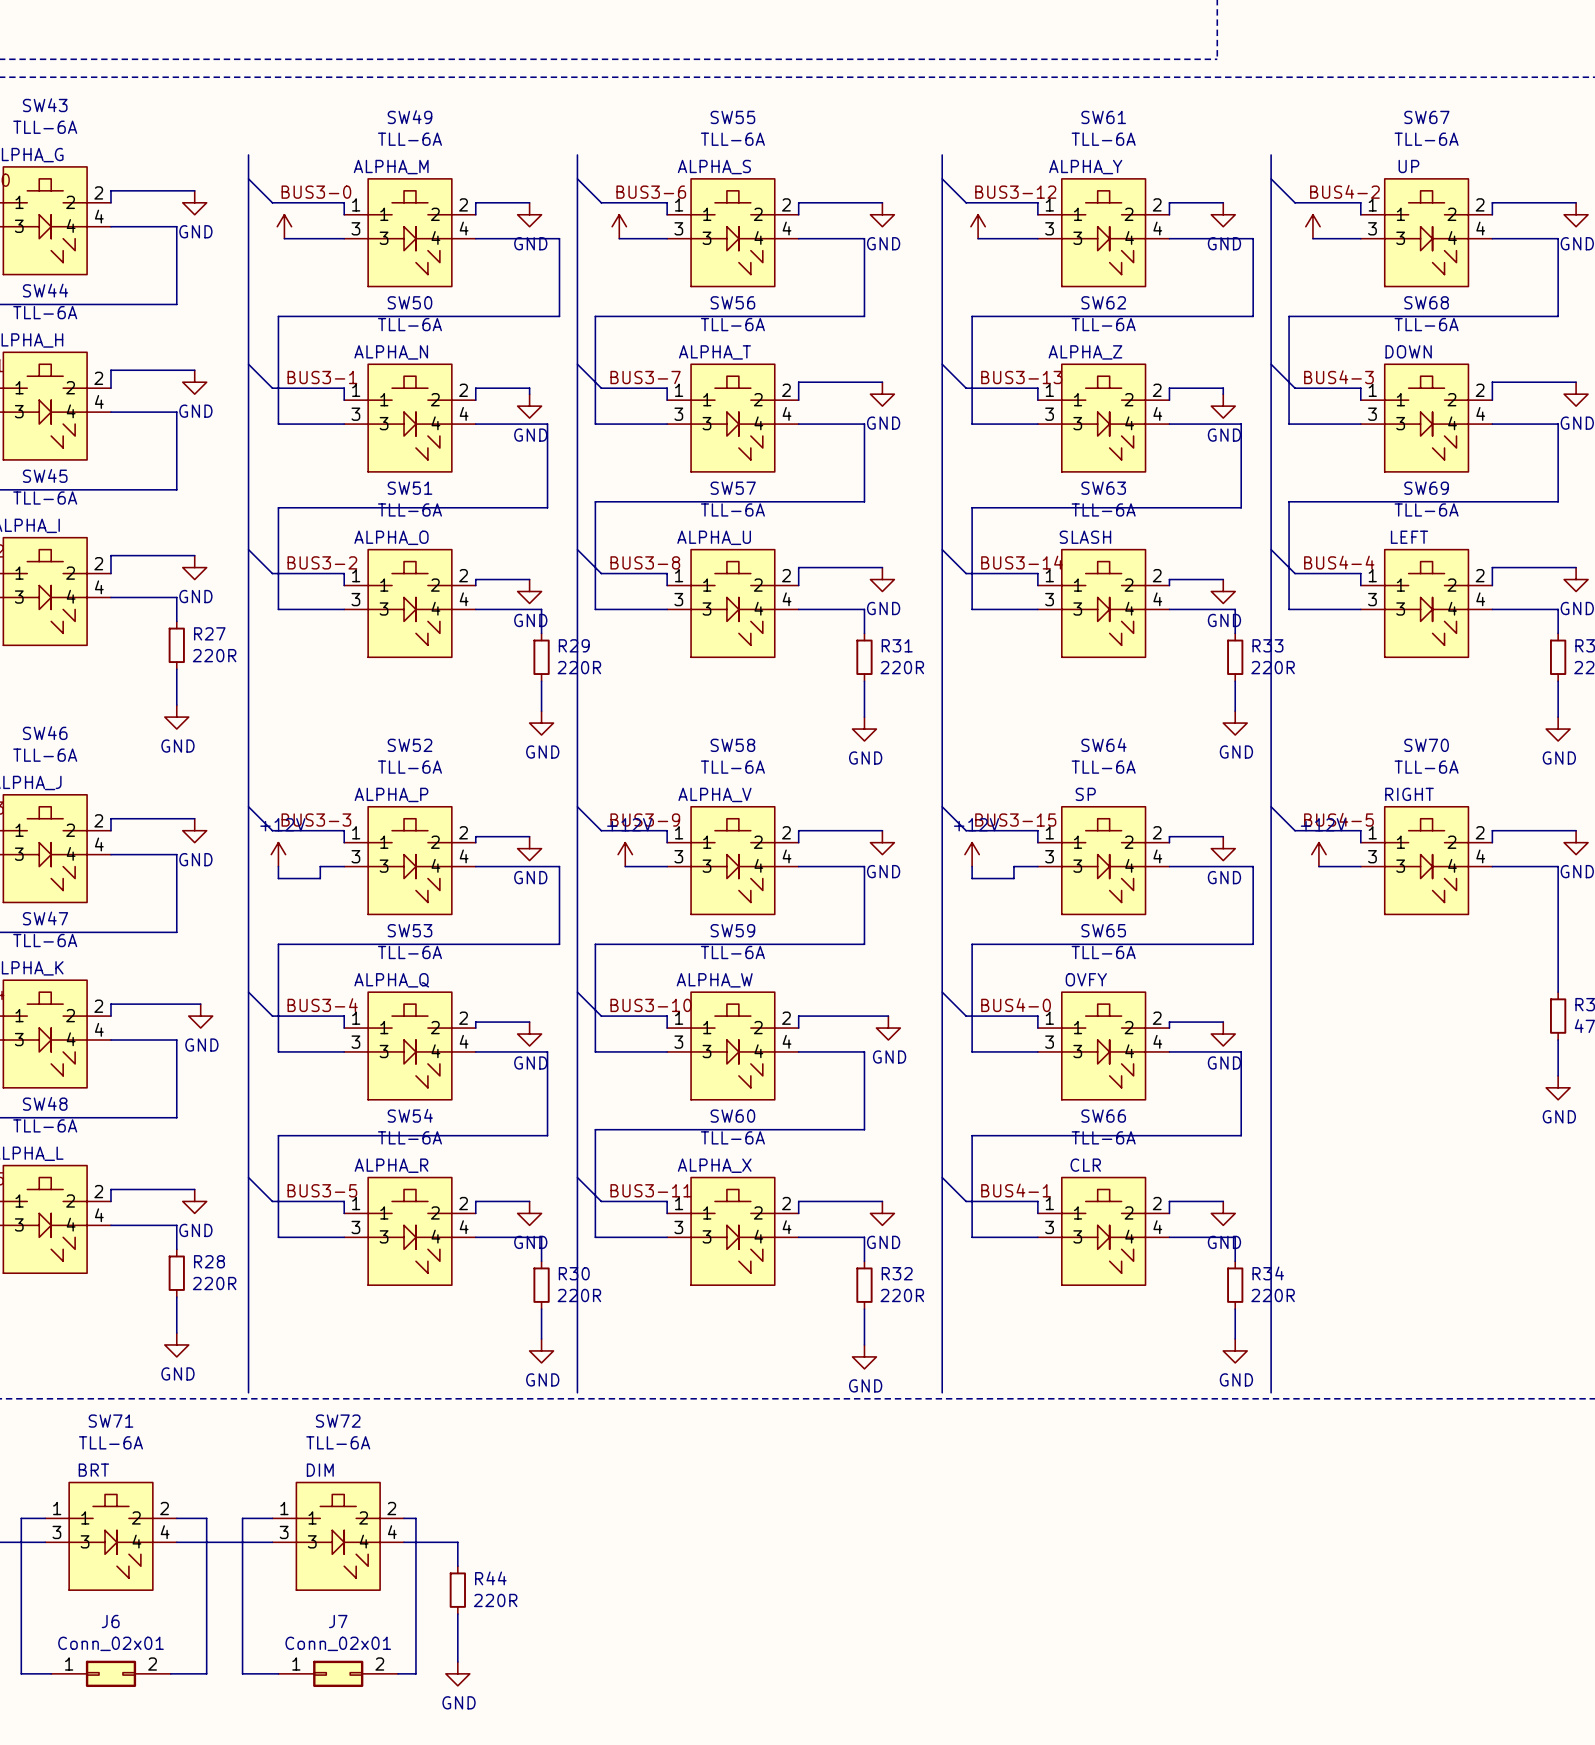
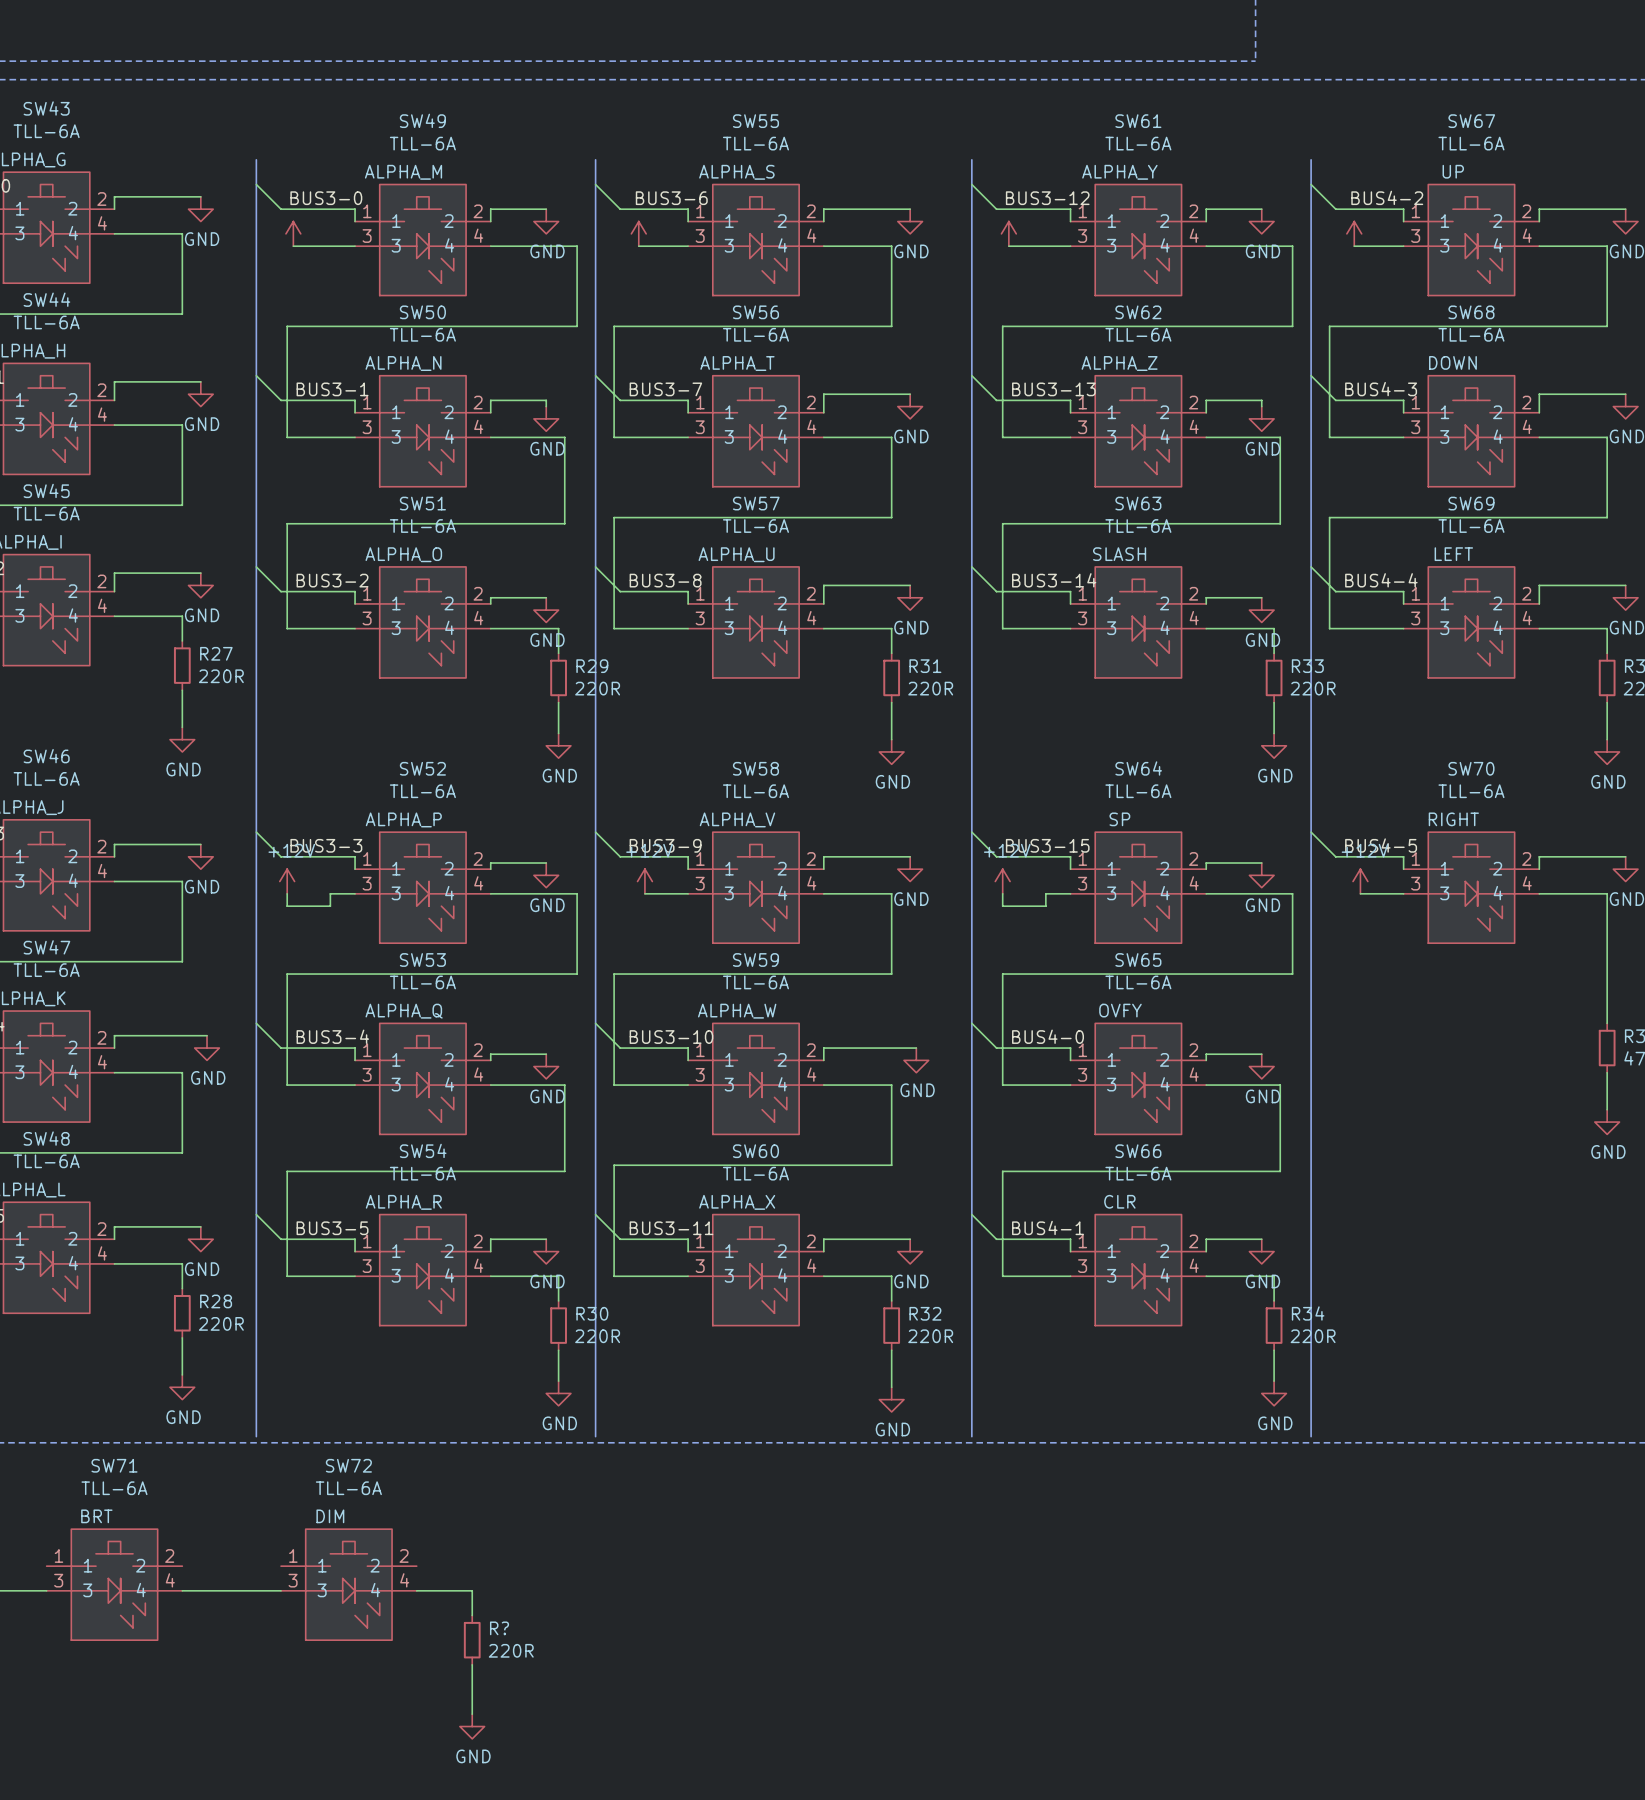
wire: (45, 1518) (21, 1518) (21, 1673) (51, 1673) -> none
wire: (176, 1518) (206, 1518) (206, 1673) (170, 1673) -> none
wire: (272, 1518) (242, 1518) (242, 1673) (278, 1673) -> none
wire: (404, 1518) (415, 1518) (415, 1673) (398, 1673) -> none
R44 name: R44 (490, 1578) -> R? (499, 1628)
J6: Conn_02x01 (110, 1673) -> none
J7: Conn_02x01 (338, 1673) -> none

